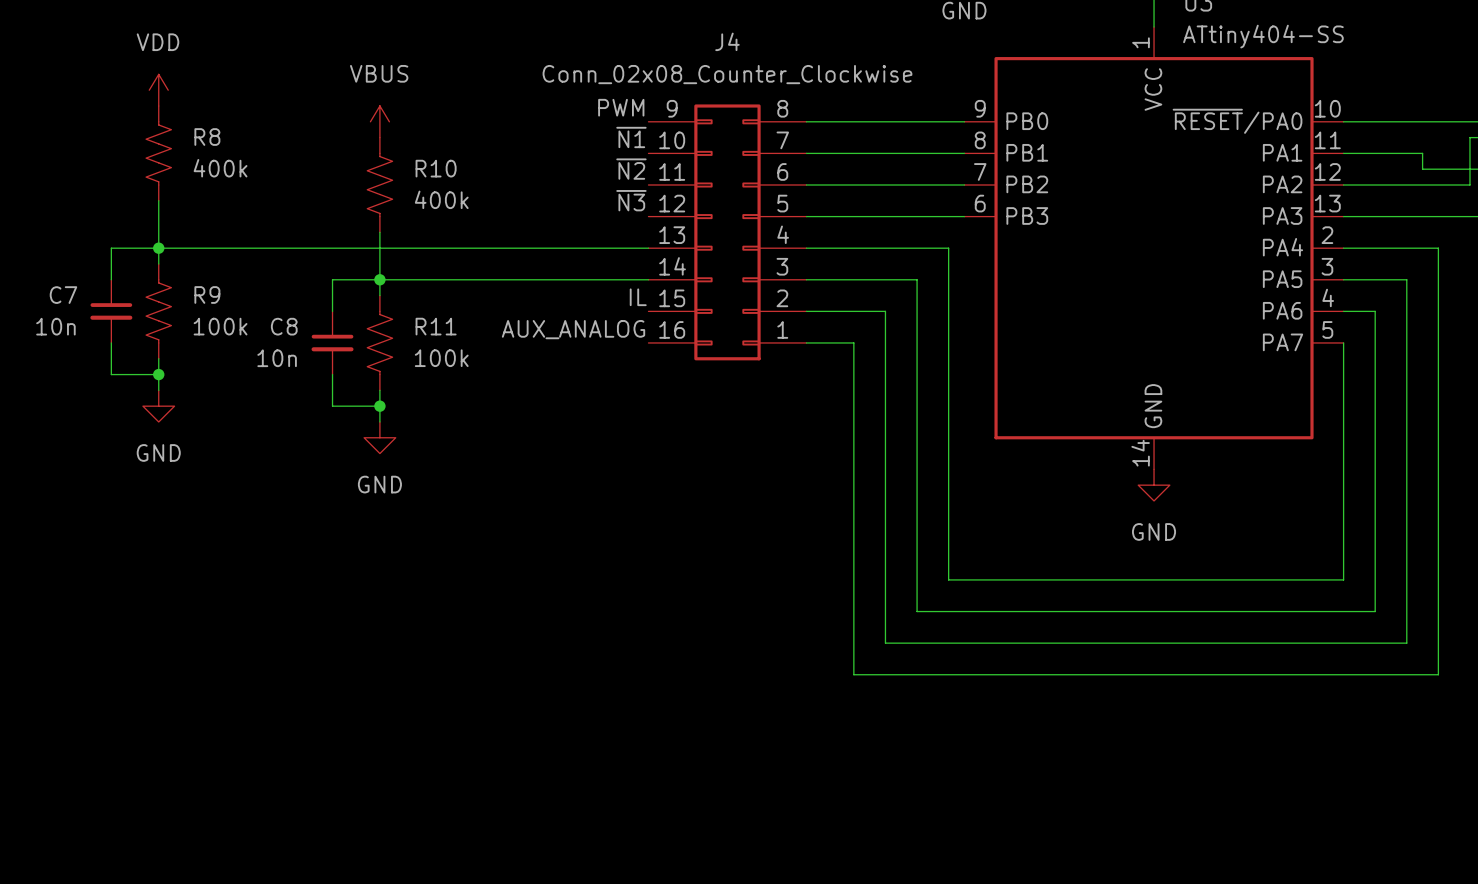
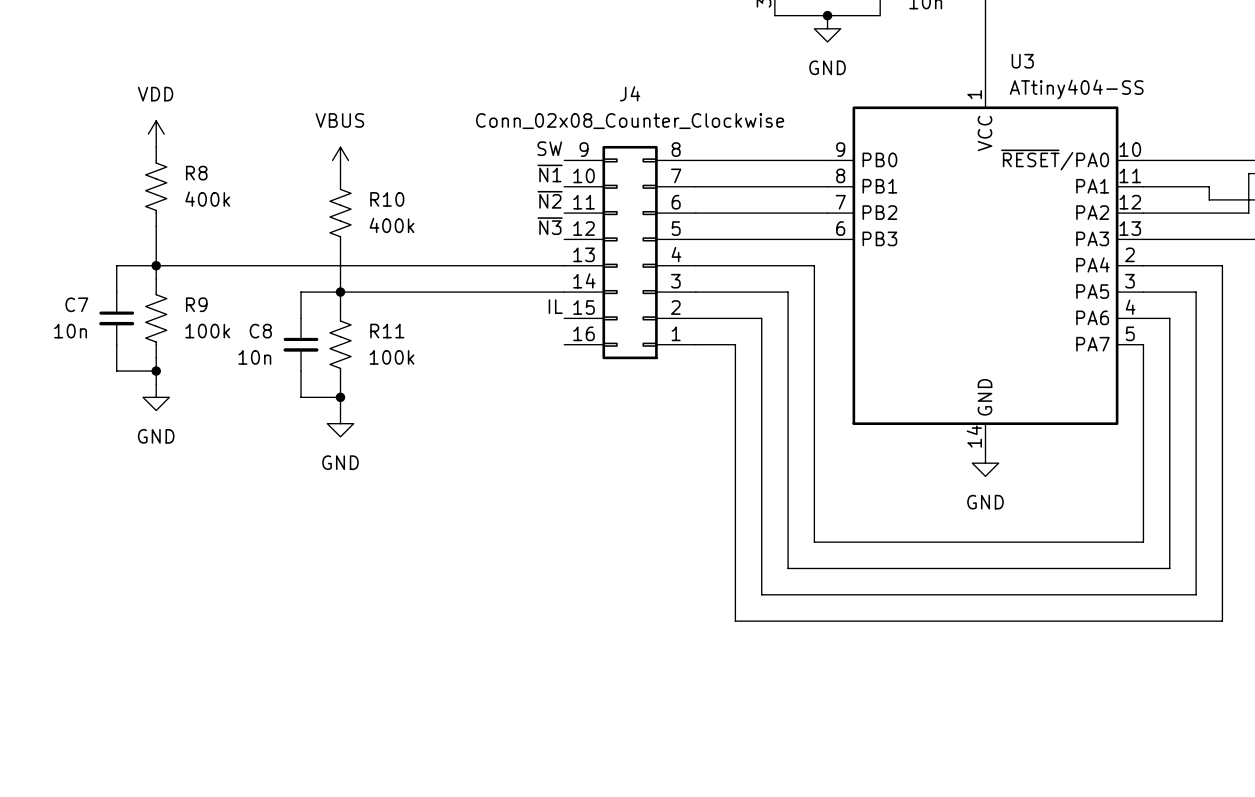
label: PWM (621, 107) -> SW (549, 148)
label: AUX_ANALOG (573, 329) -> none

